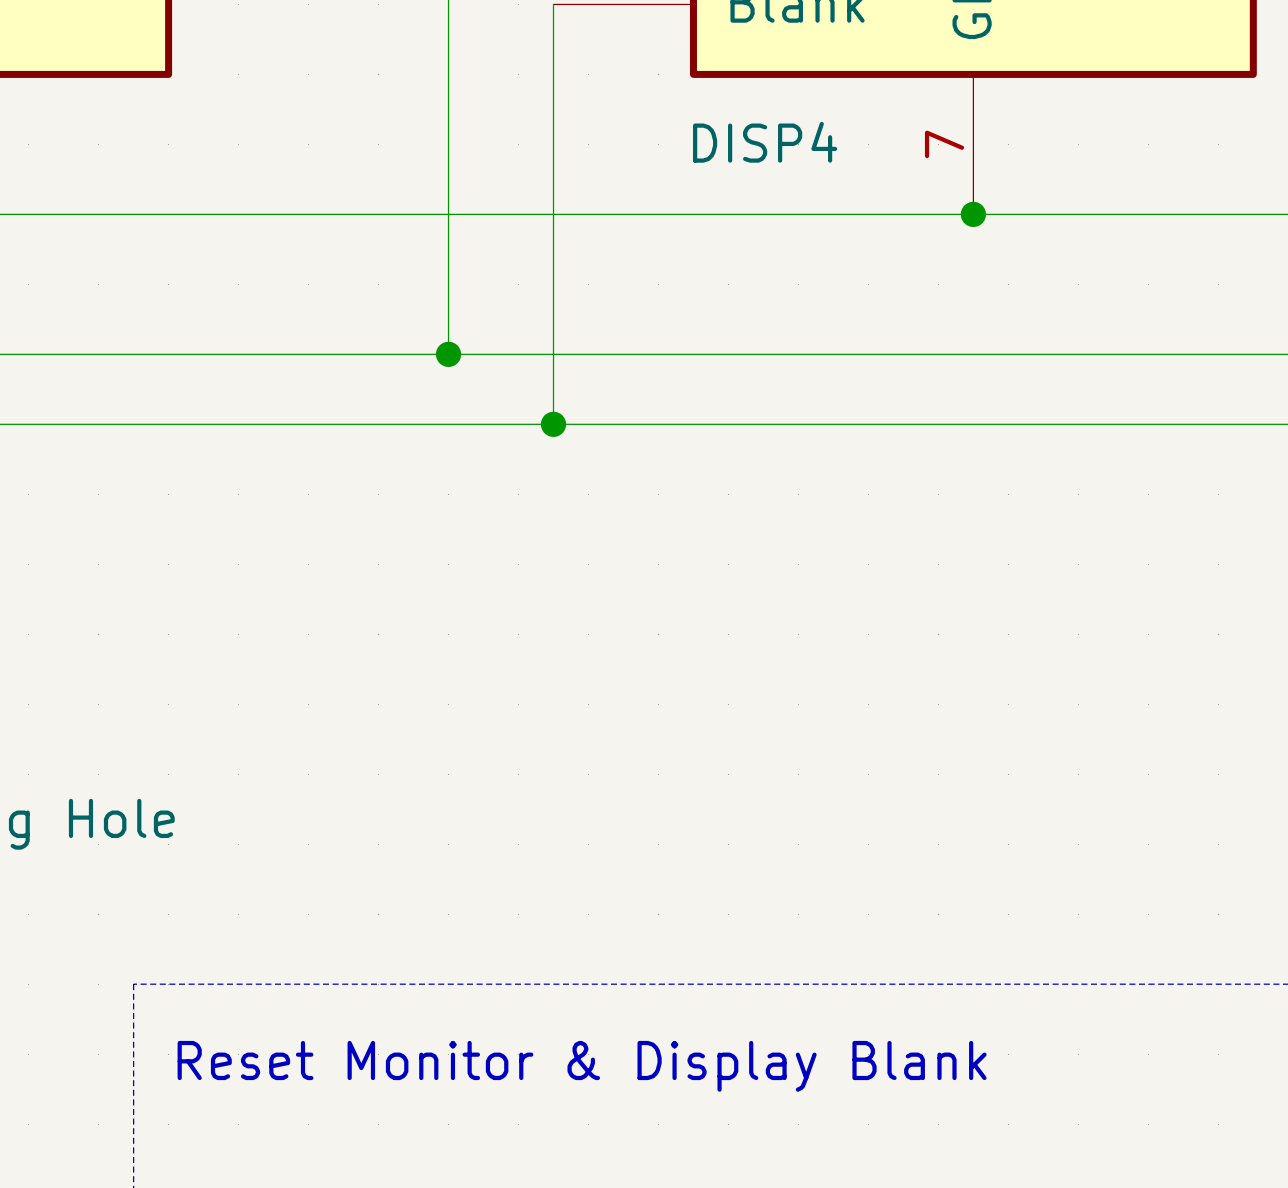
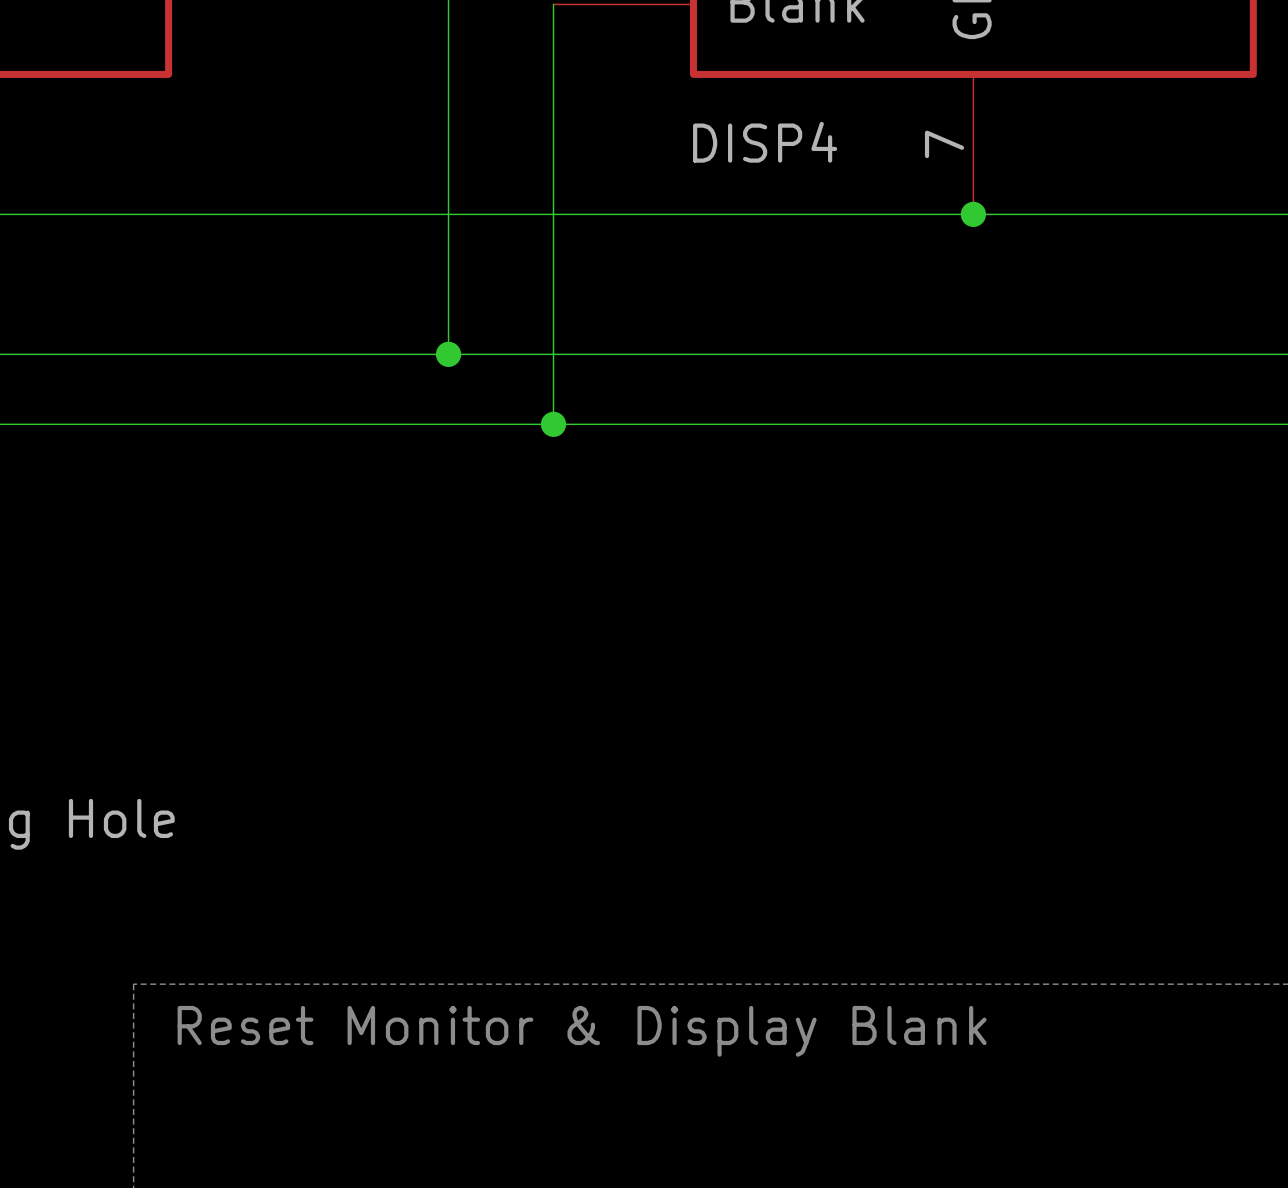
text position: Reset Monitor & Display Blank (582, 1066) -> Reset Monitor & Display Blank (582, 1031)

